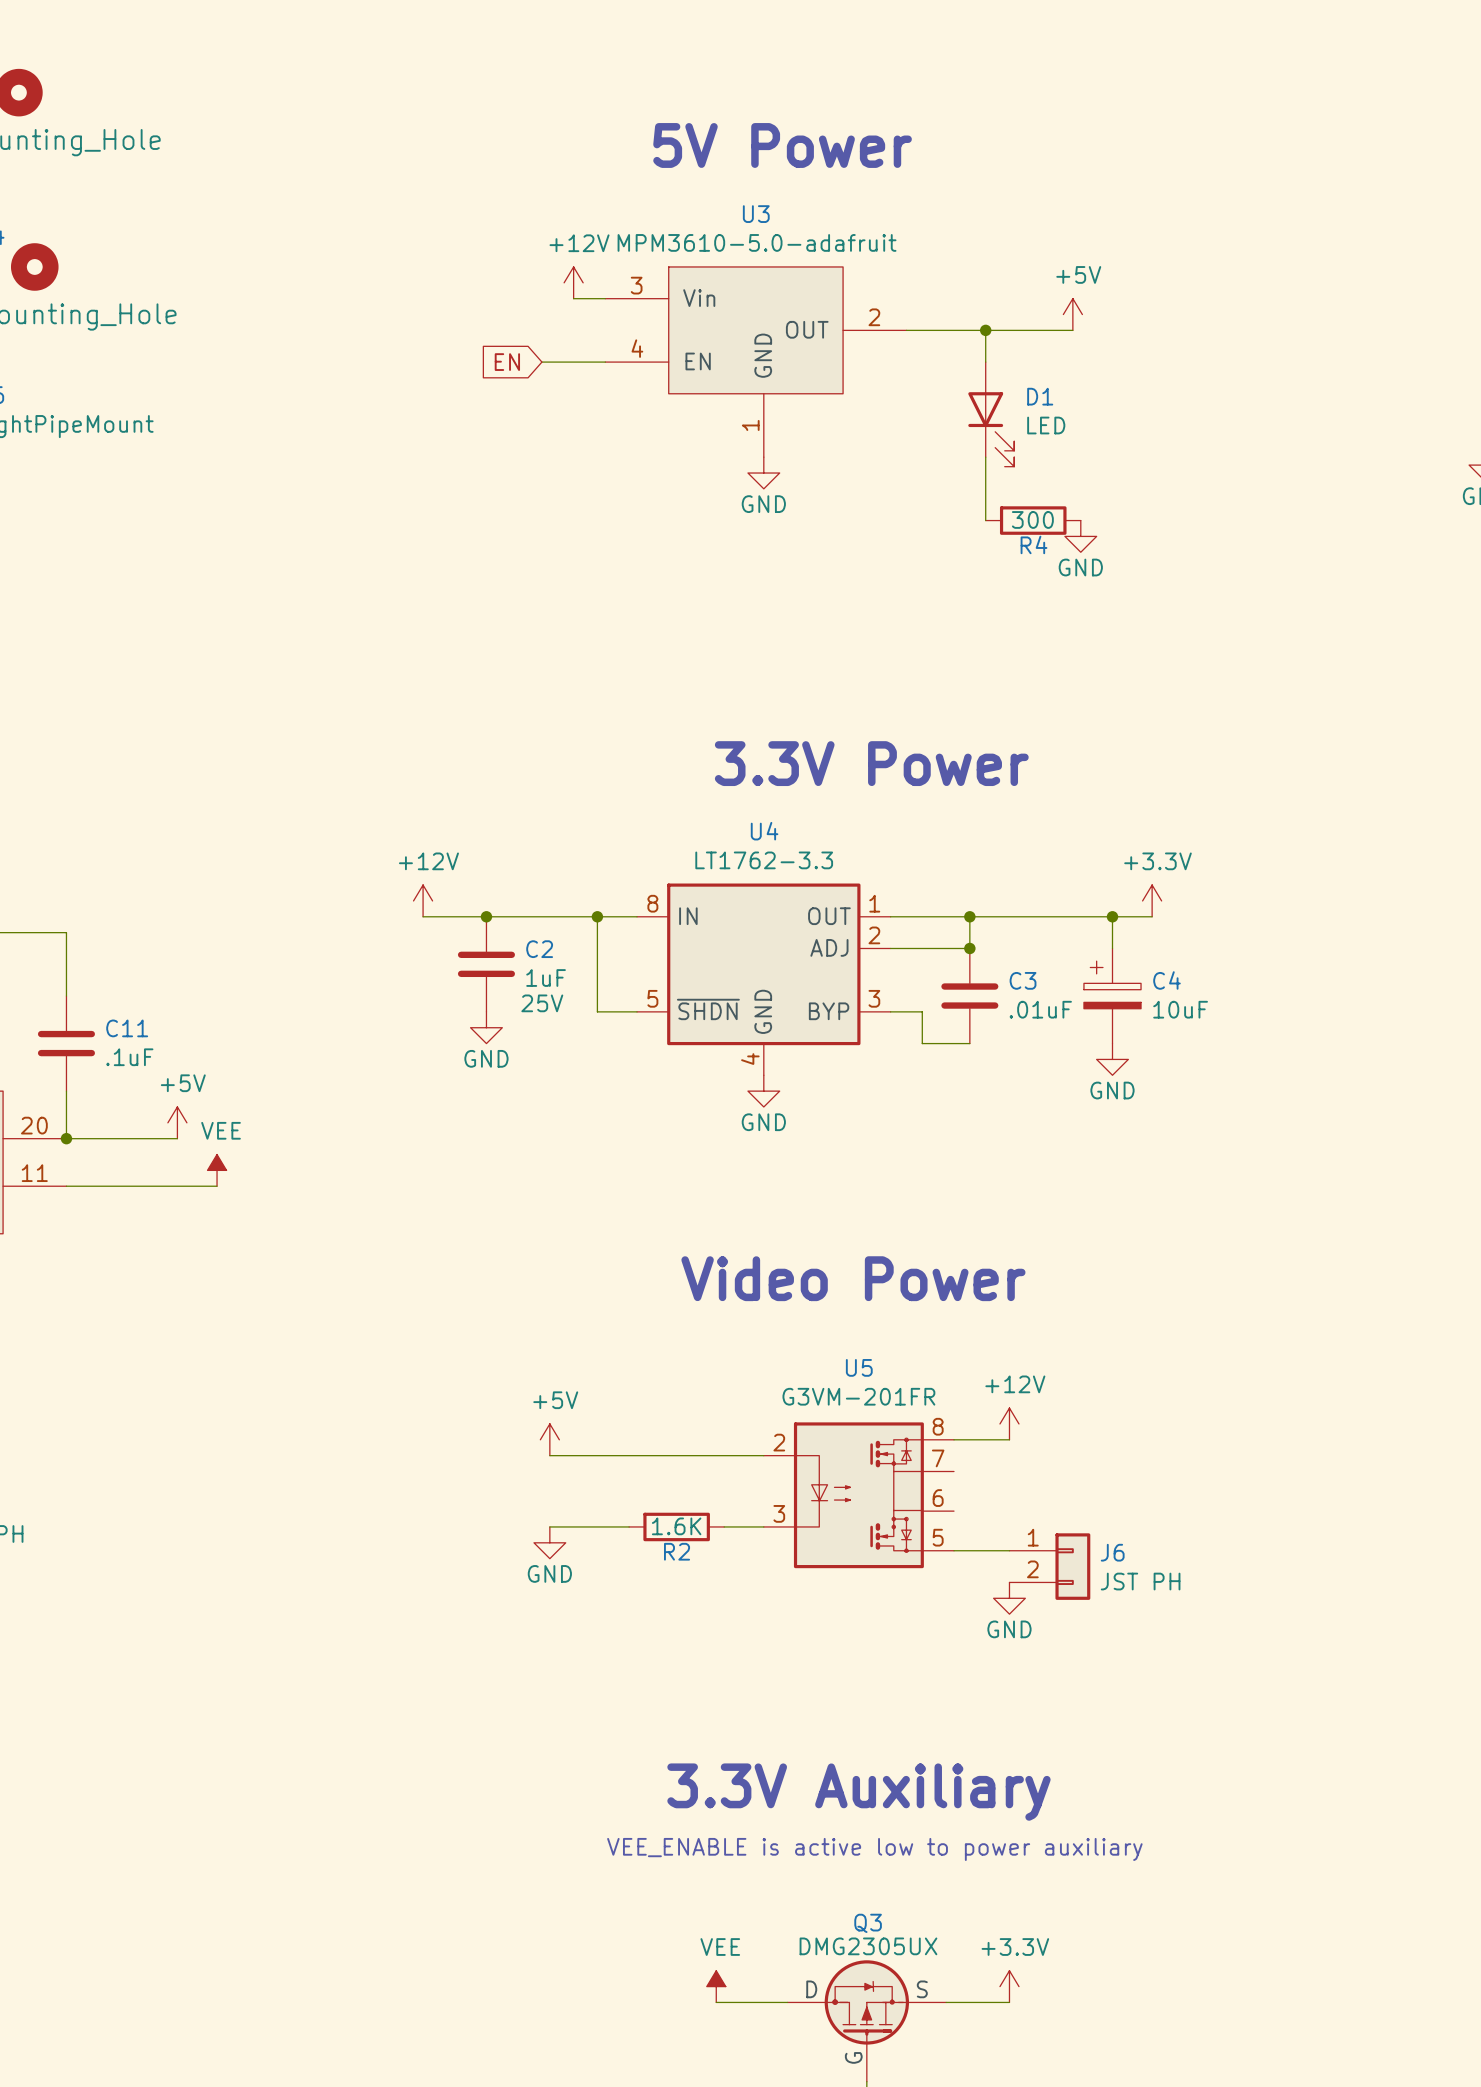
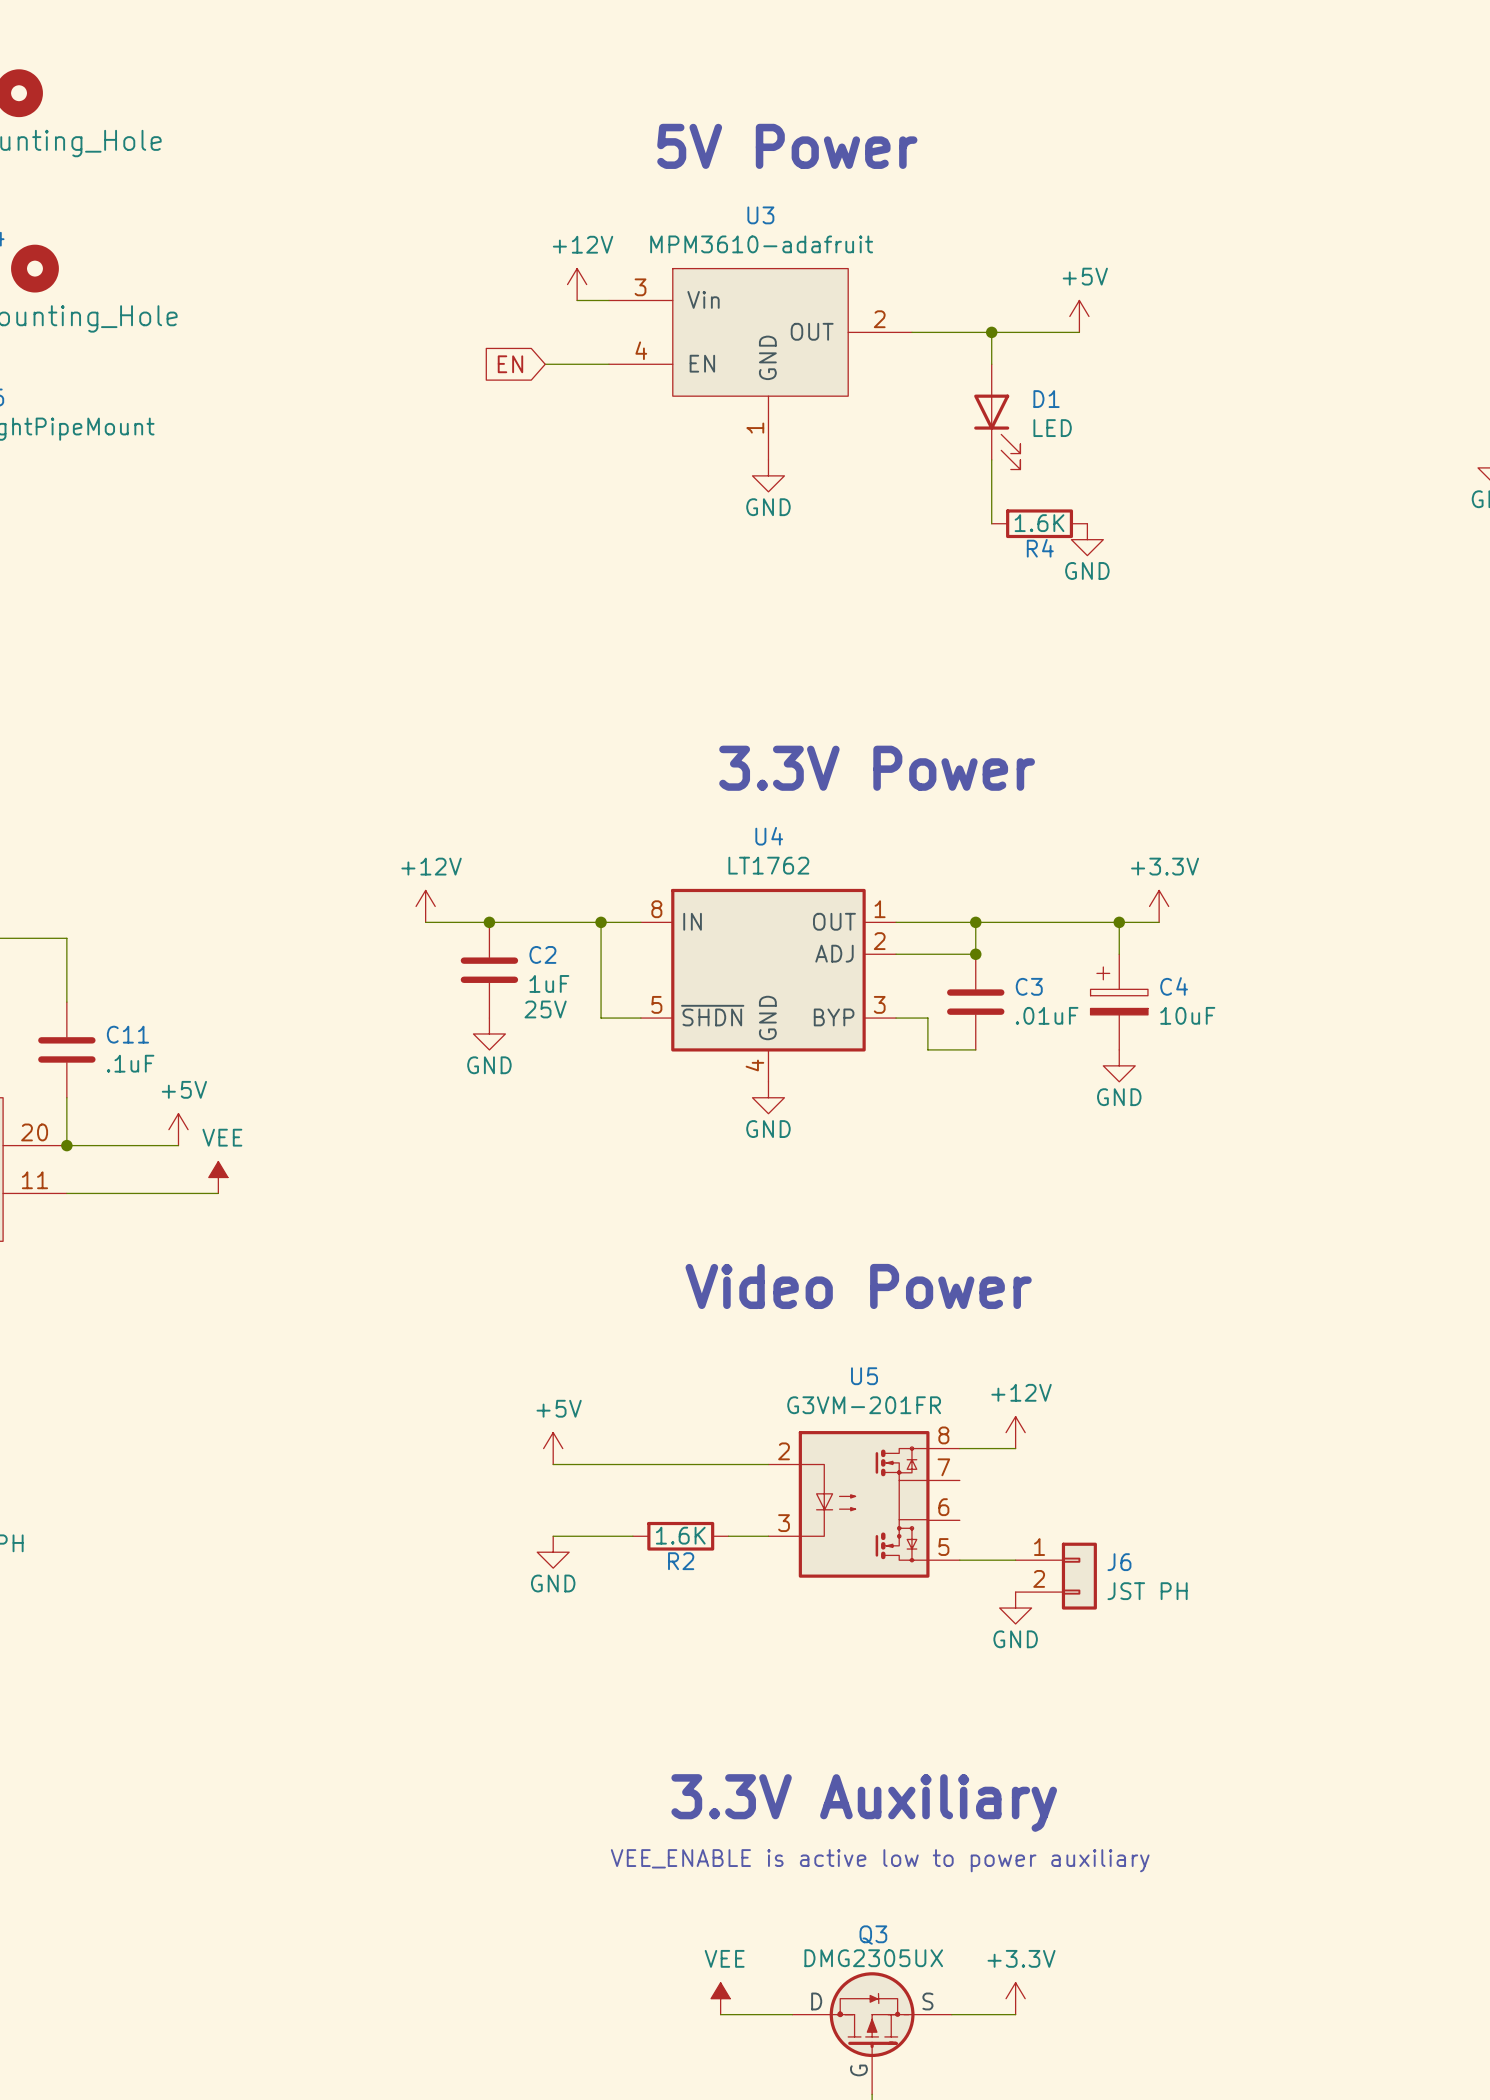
U3 value: MPM3610-5.0-adafruit (757, 242) -> MPM3610-adafruit (761, 244)
R4 value: 300 (1032, 519) -> 1.6K (1039, 523)
U4 value: LT1762-3.3 (764, 860) -> LT1762 (768, 865)

